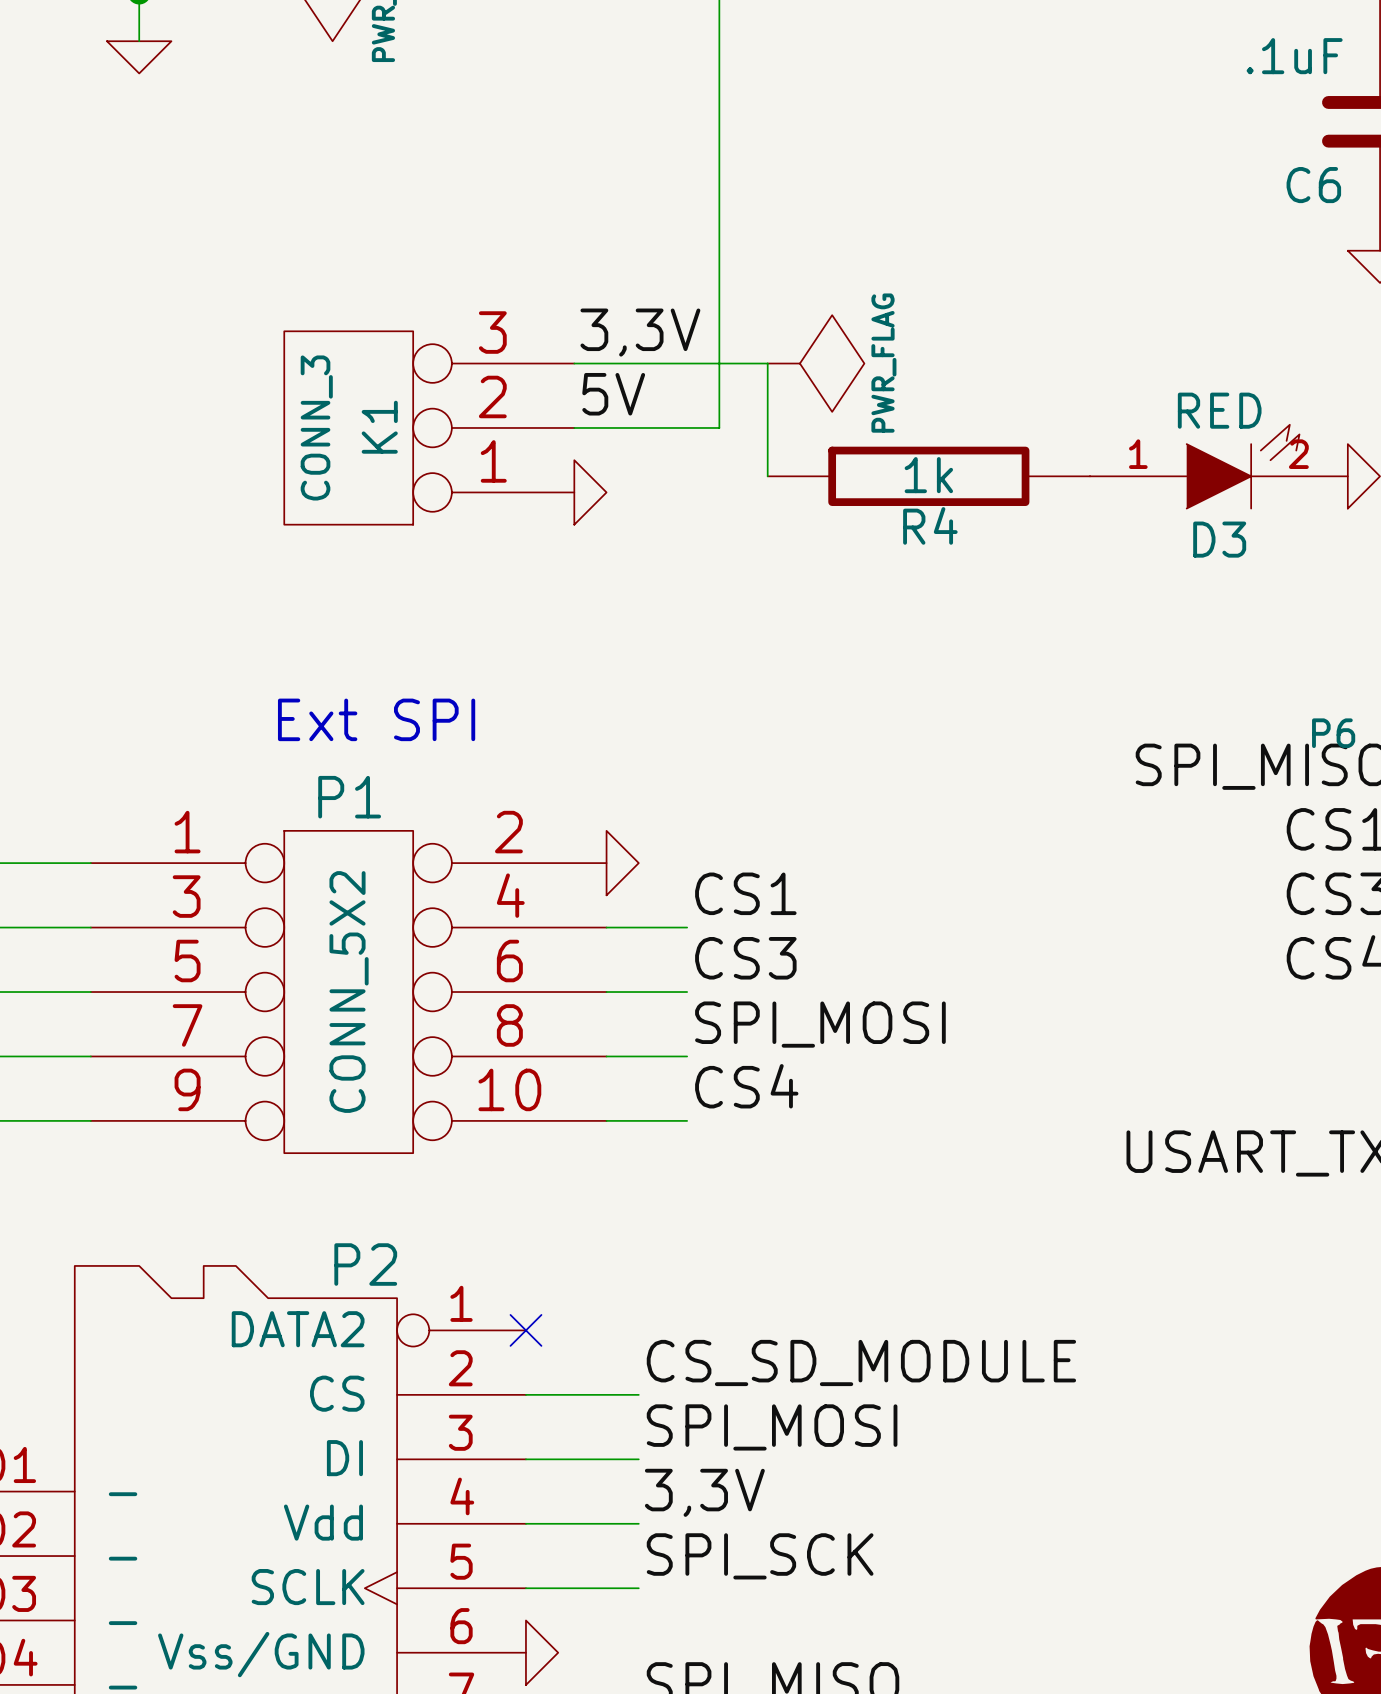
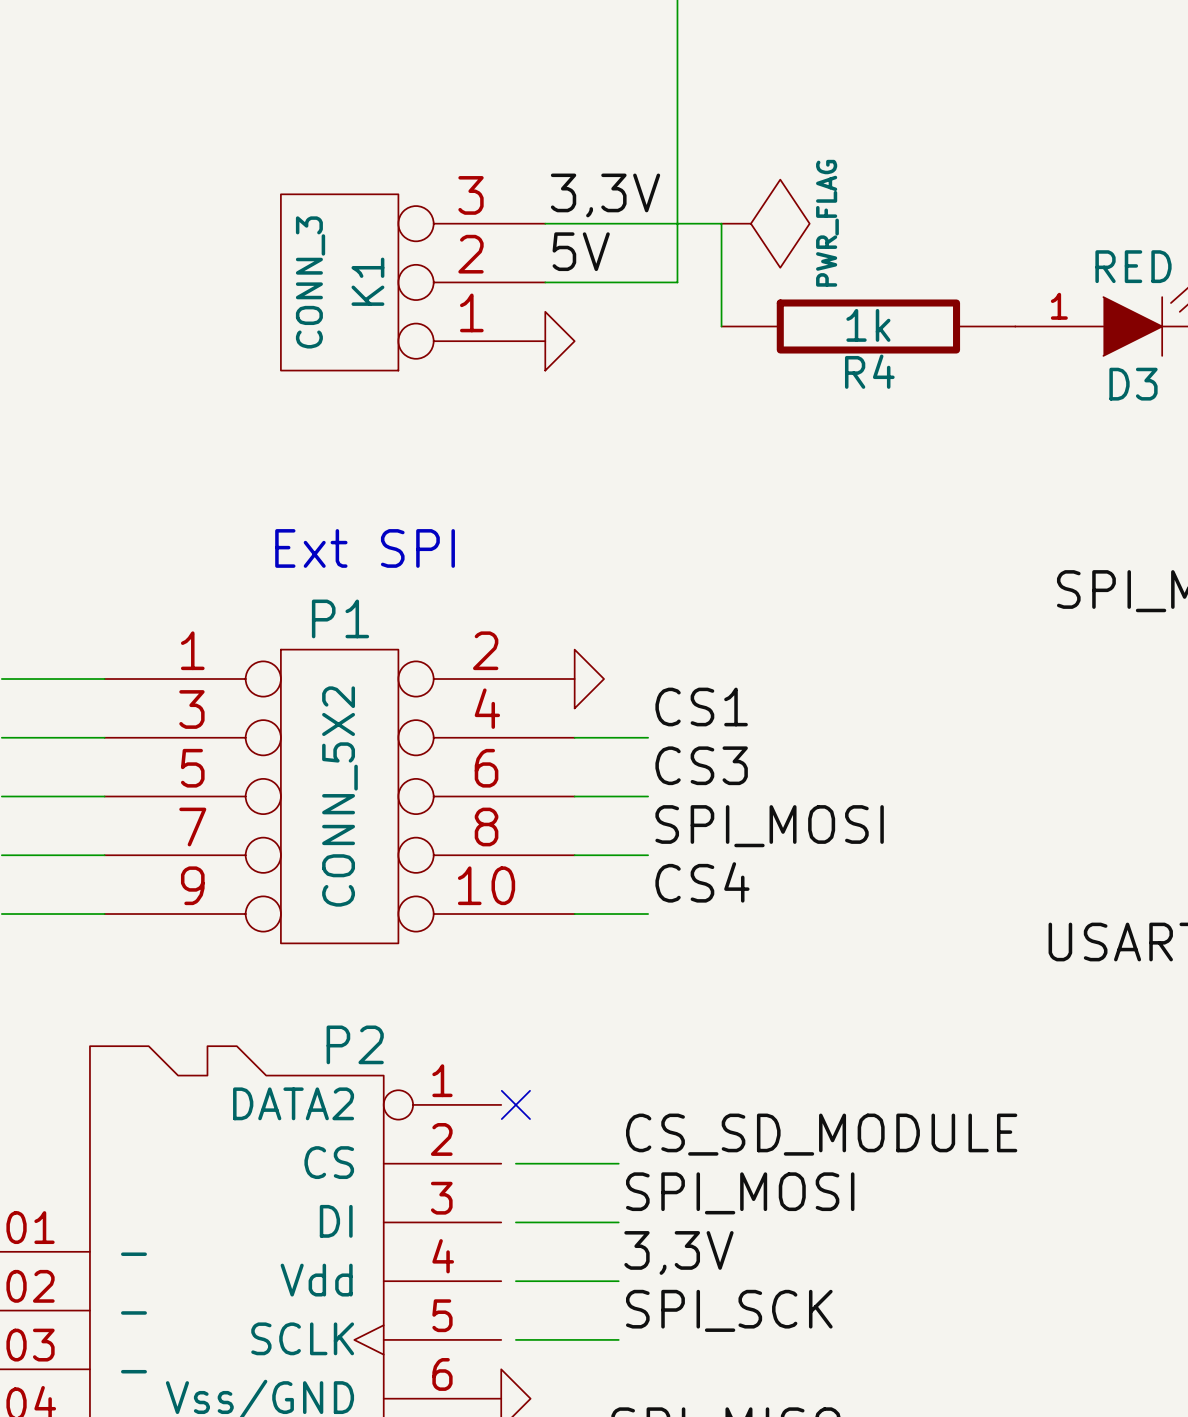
no-connect mark position: (525, 1330) -> (515, 1104)
label position: CS_SD_MODULE (861, 1362) -> CS_SD_MODULE (821, 1134)
wire: (525, 1394) (542, 1394) -> (604, 1163) (618, 1163)
label position: SPI_MOSI (772, 1427) -> SPI_MOSI (740, 1193)
wire: (525, 1459) (542, 1459) -> (604, 1222) (618, 1222)
label position: 3,3V (704, 1492) -> 3,3V (678, 1252)
wire: (525, 1523) (542, 1523) -> (604, 1281) (618, 1281)
label position: SPI_SCK (760, 1556) -> SPI_SCK (729, 1310)
wire: (525, 1588) (542, 1588) -> (604, 1339) (618, 1339)

